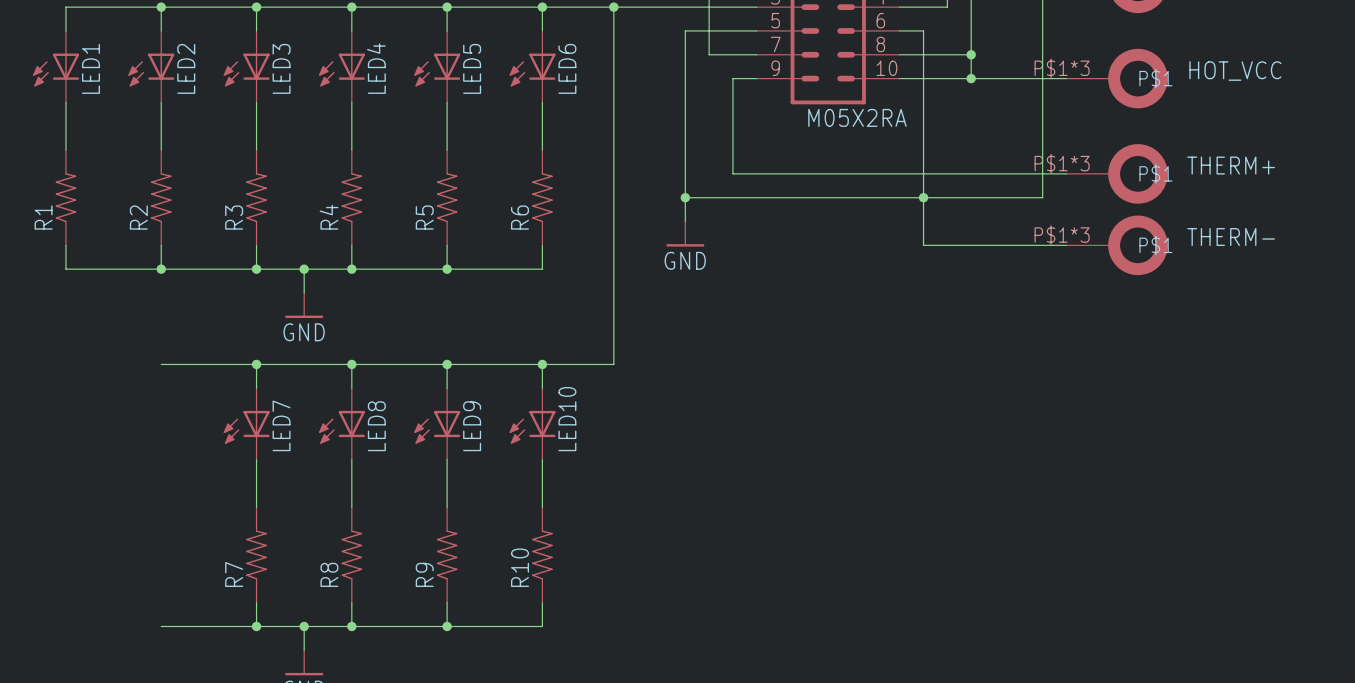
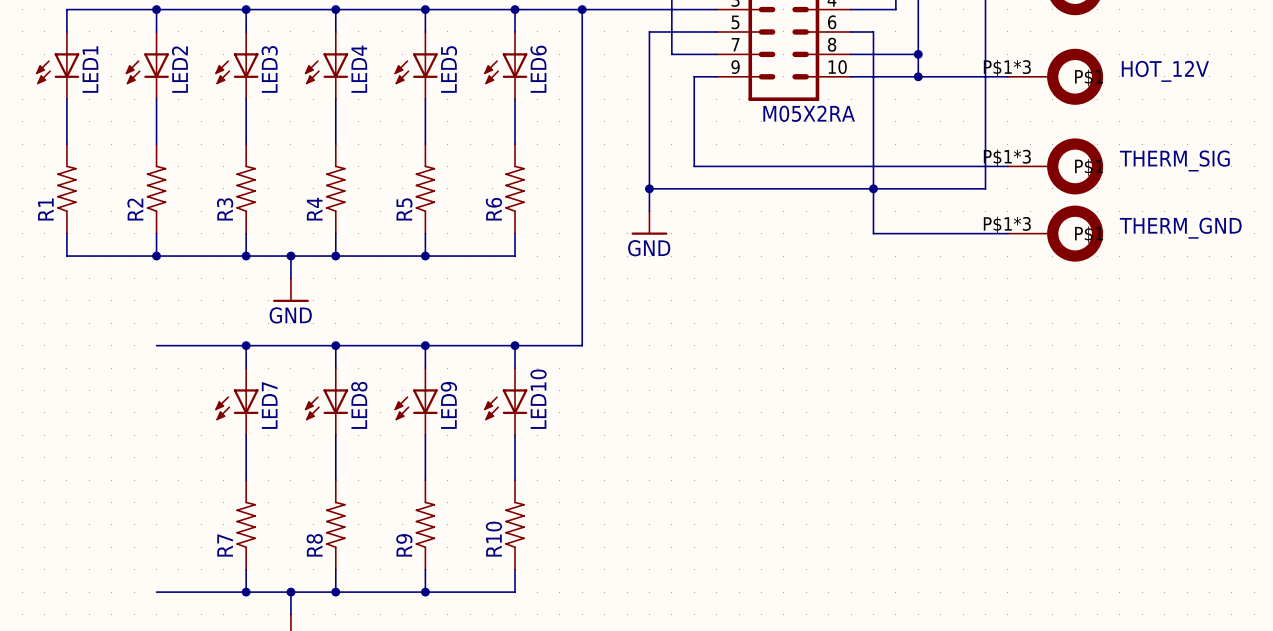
HOT_VCC name: HOT_VCC (1235, 71) -> HOT_12V (1165, 71)
THERM+ name: THERM+ (1231, 165) -> THERM_SIG (1174, 160)
THERM- name: THERM- (1231, 237) -> THERM_GND (1180, 228)

